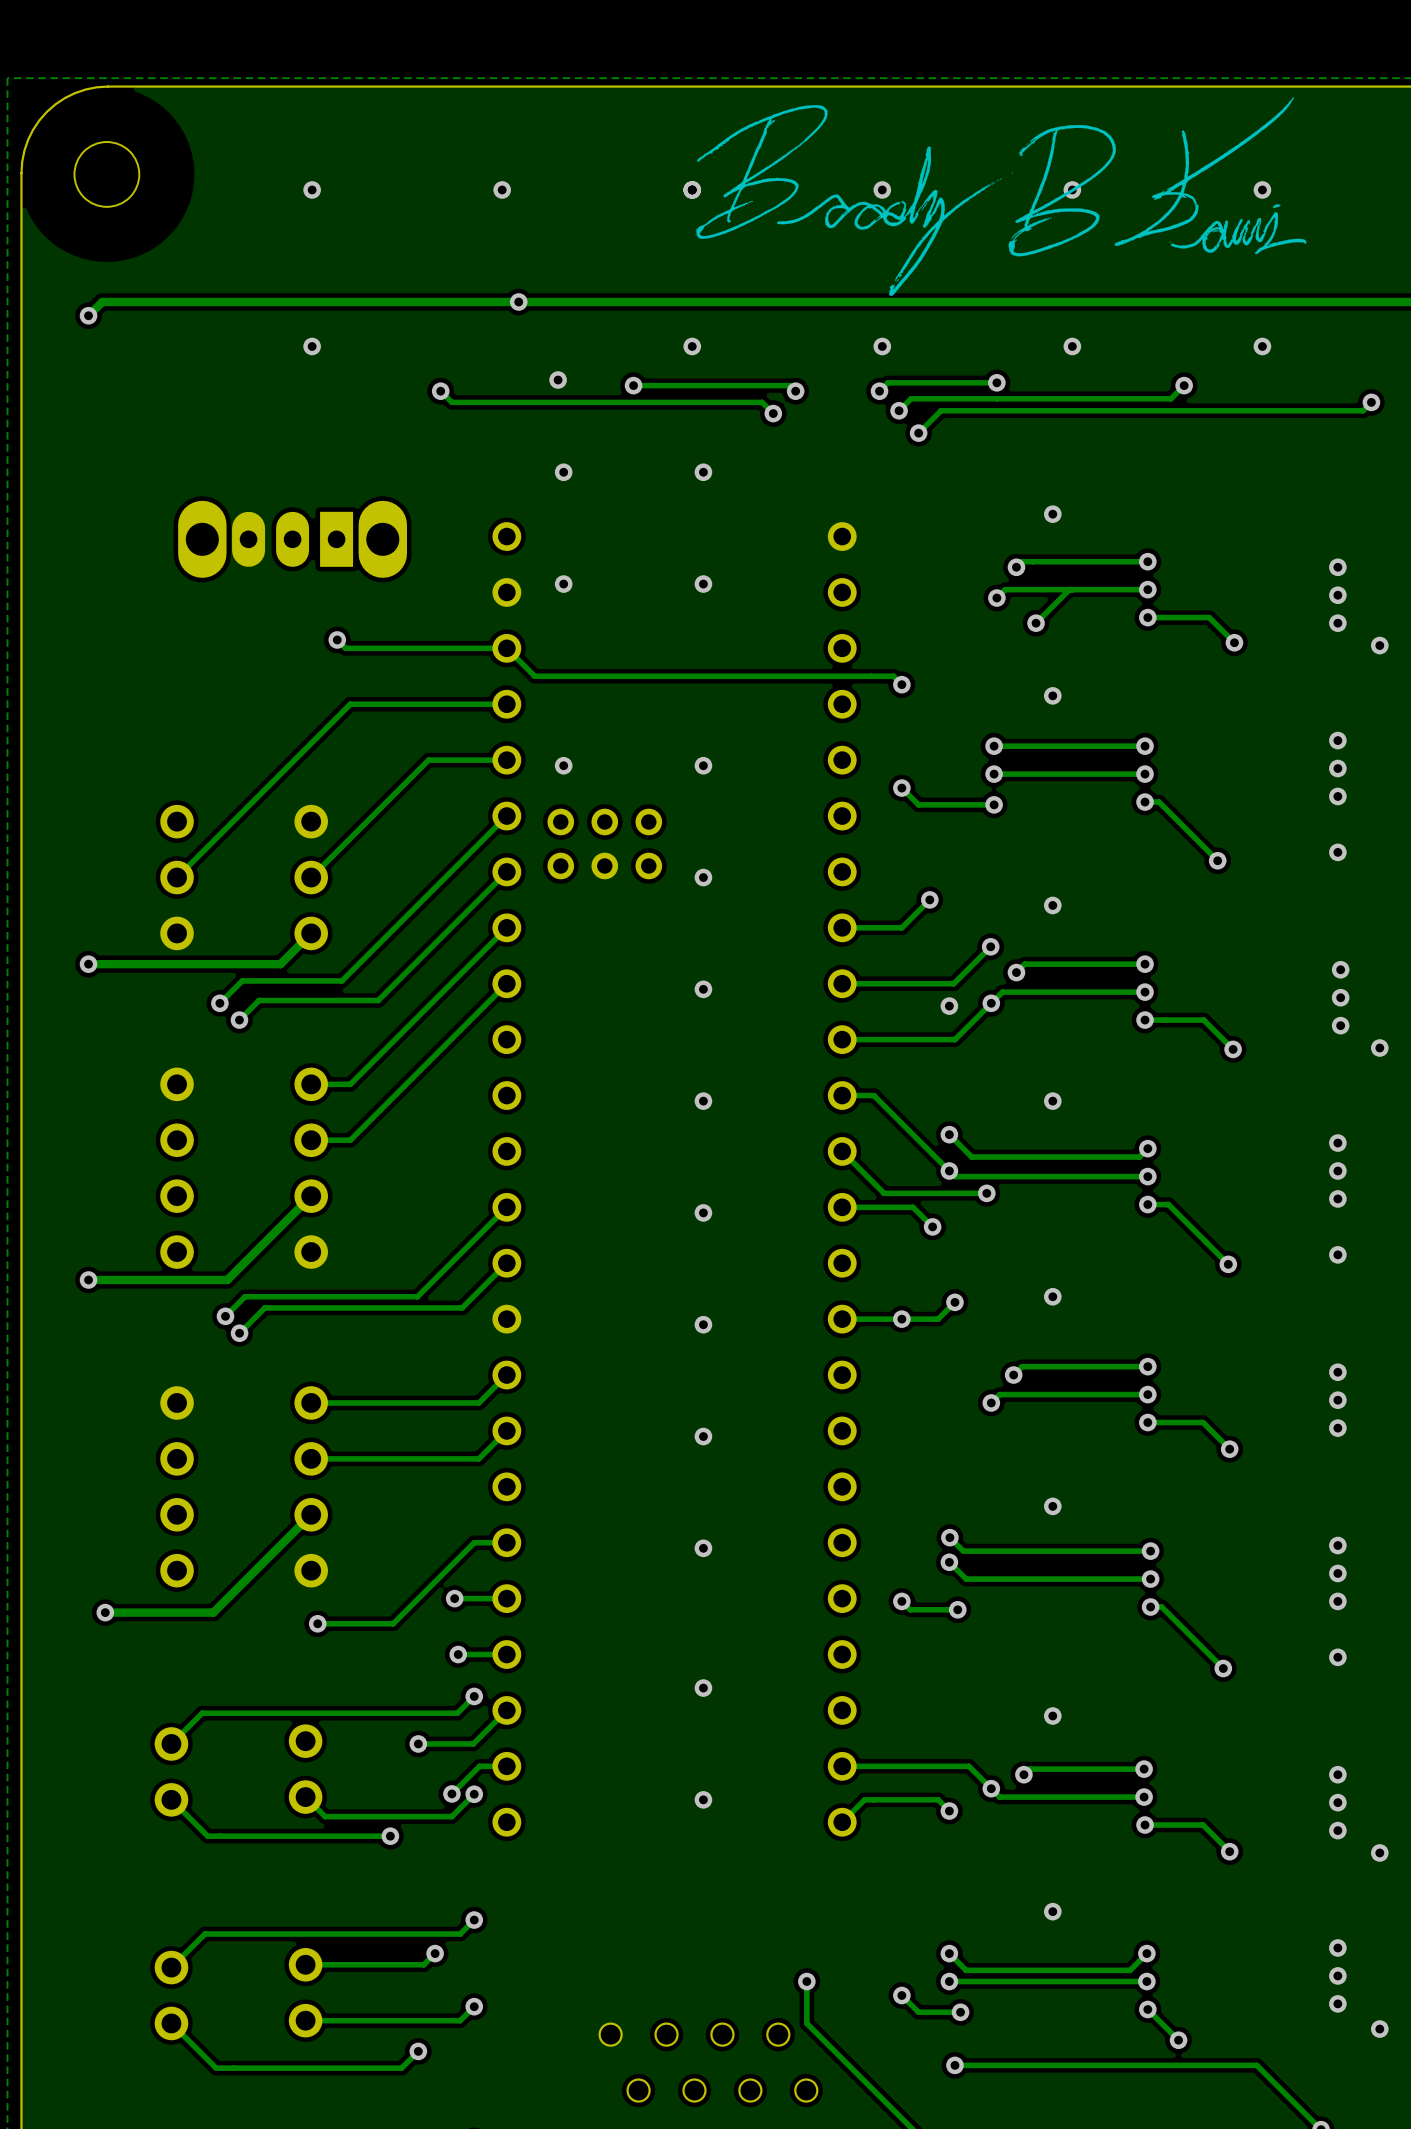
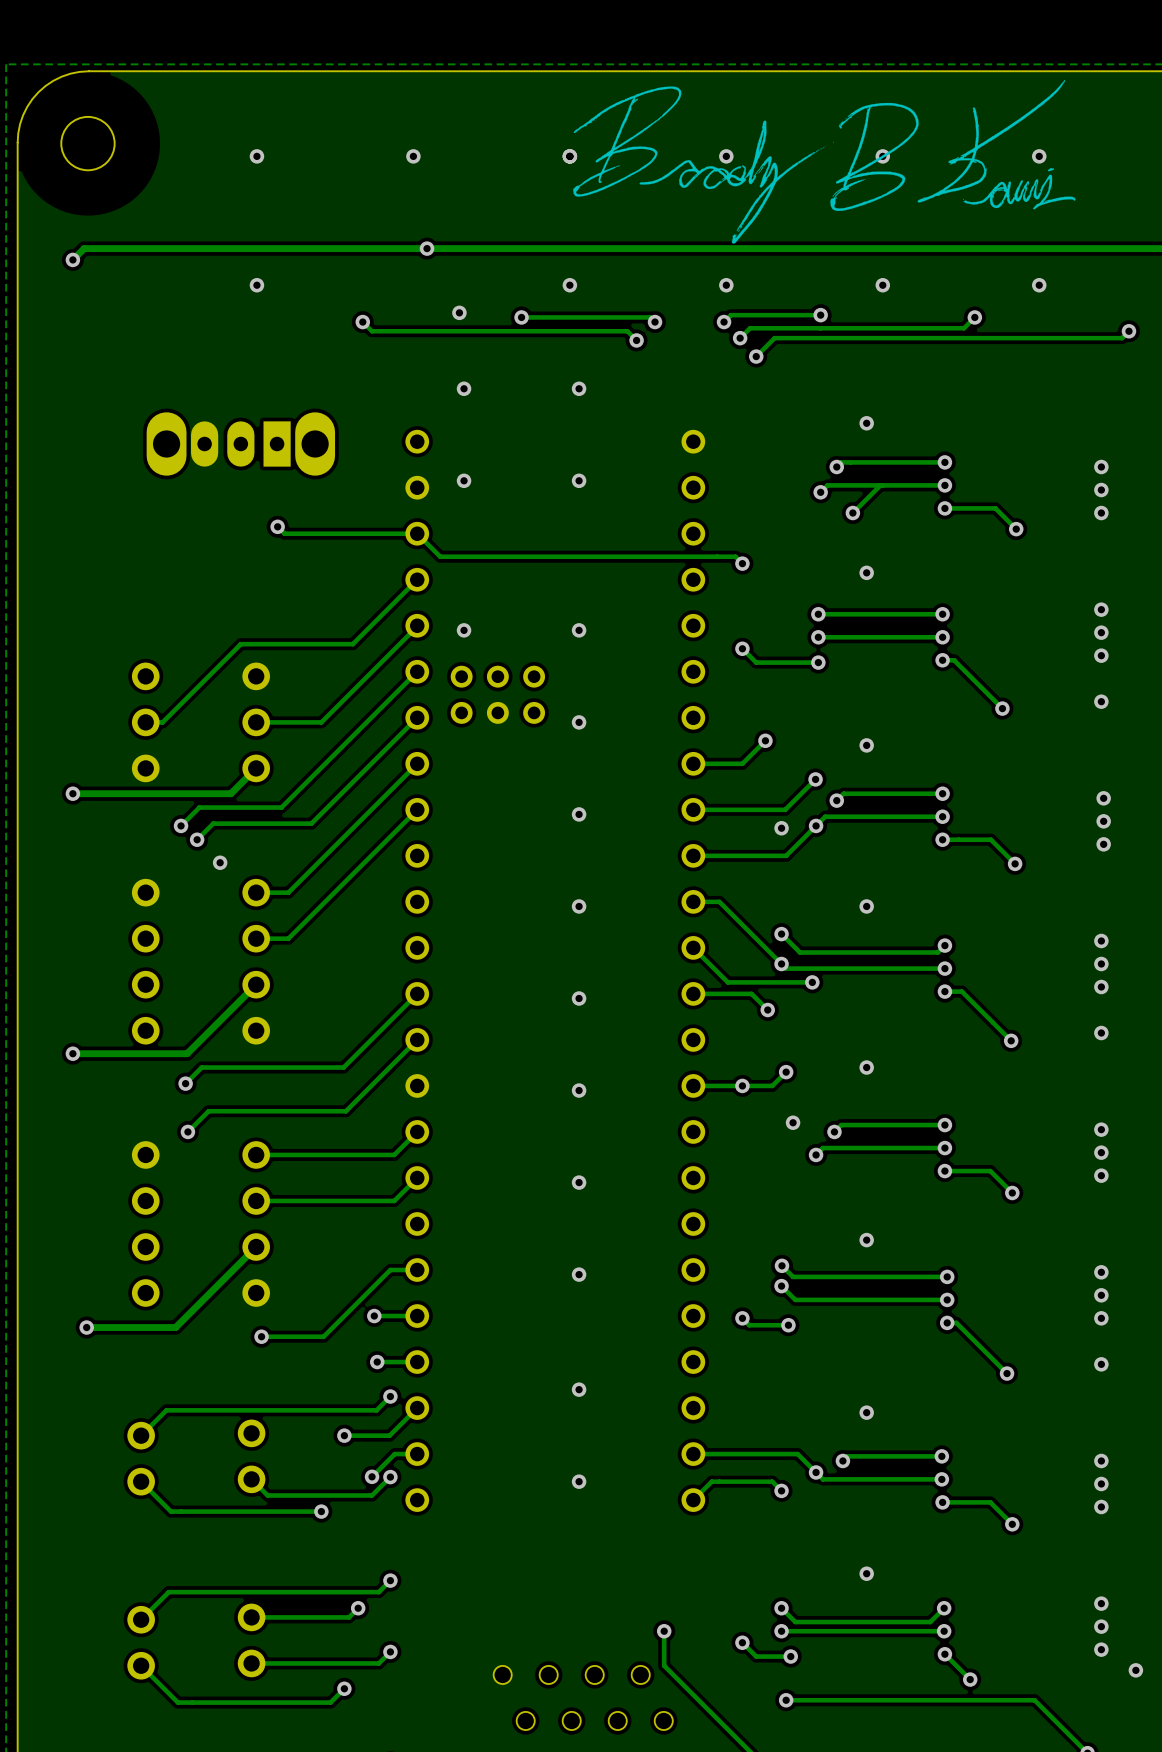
via: (1379, 645) -> none
track: (506, 704) (350, 704) (177, 877) -> (417, 579) (352, 644) (240, 644) (162, 722) (145, 722)
track: (506, 760) (428, 760) (311, 877) -> (417, 625) (321, 722) (256, 722)
via: none -> (220, 862)
via: (1379, 1048) -> none
track: (462, 1307) (264, 1307) (239, 1333) -> (380, 1076) (345, 1111) (208, 1111) (187, 1131)
via position: (239, 1333) -> (187, 1131)
via: none -> (793, 1122)
via: (1379, 1852) -> none

